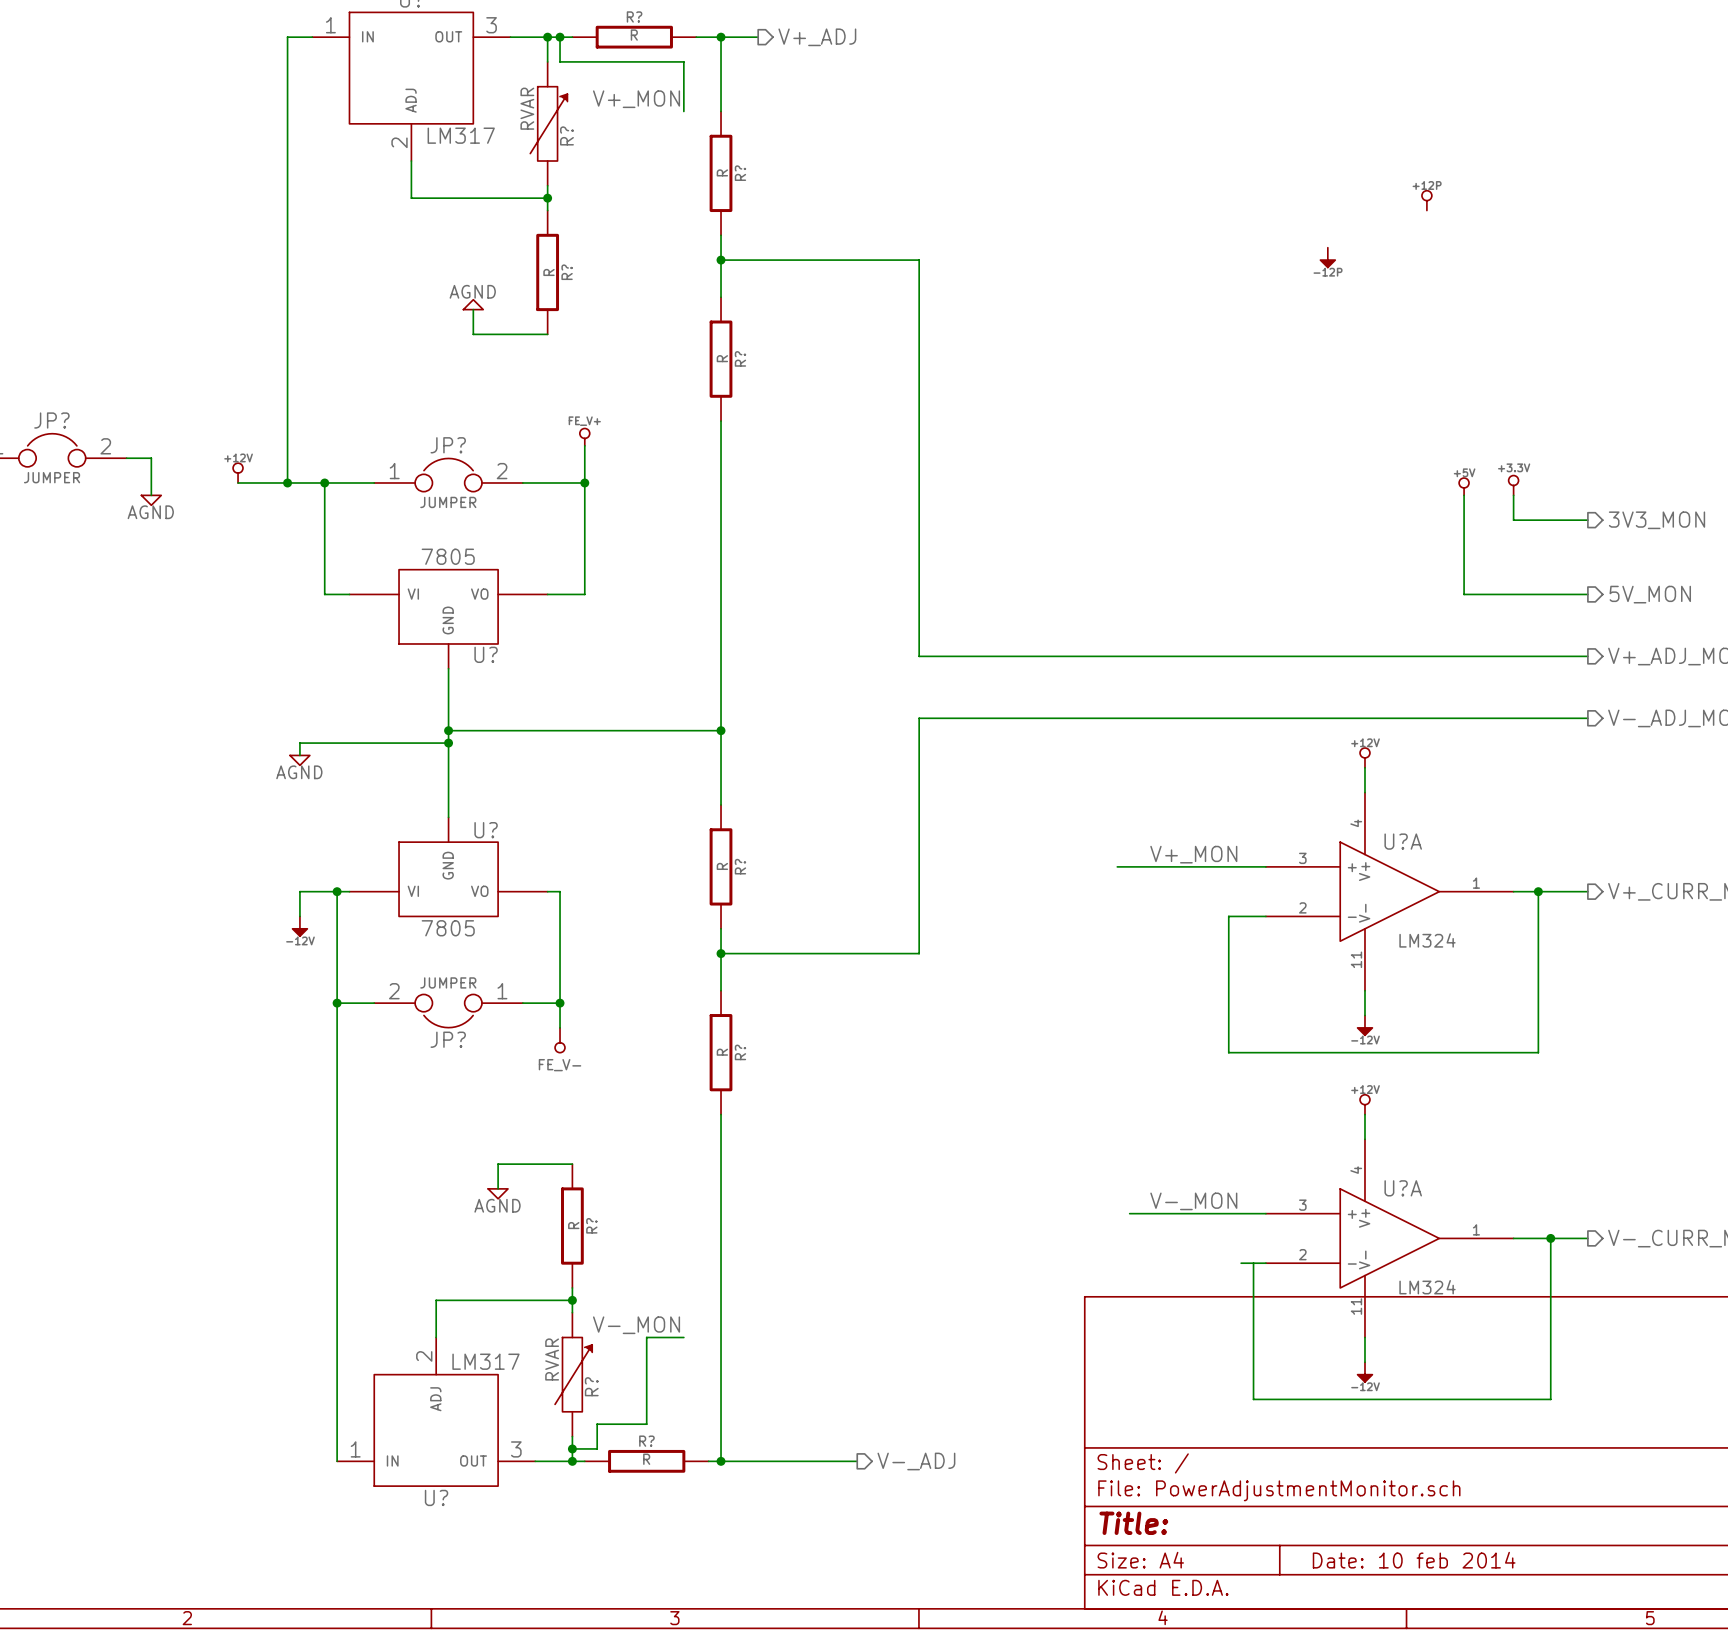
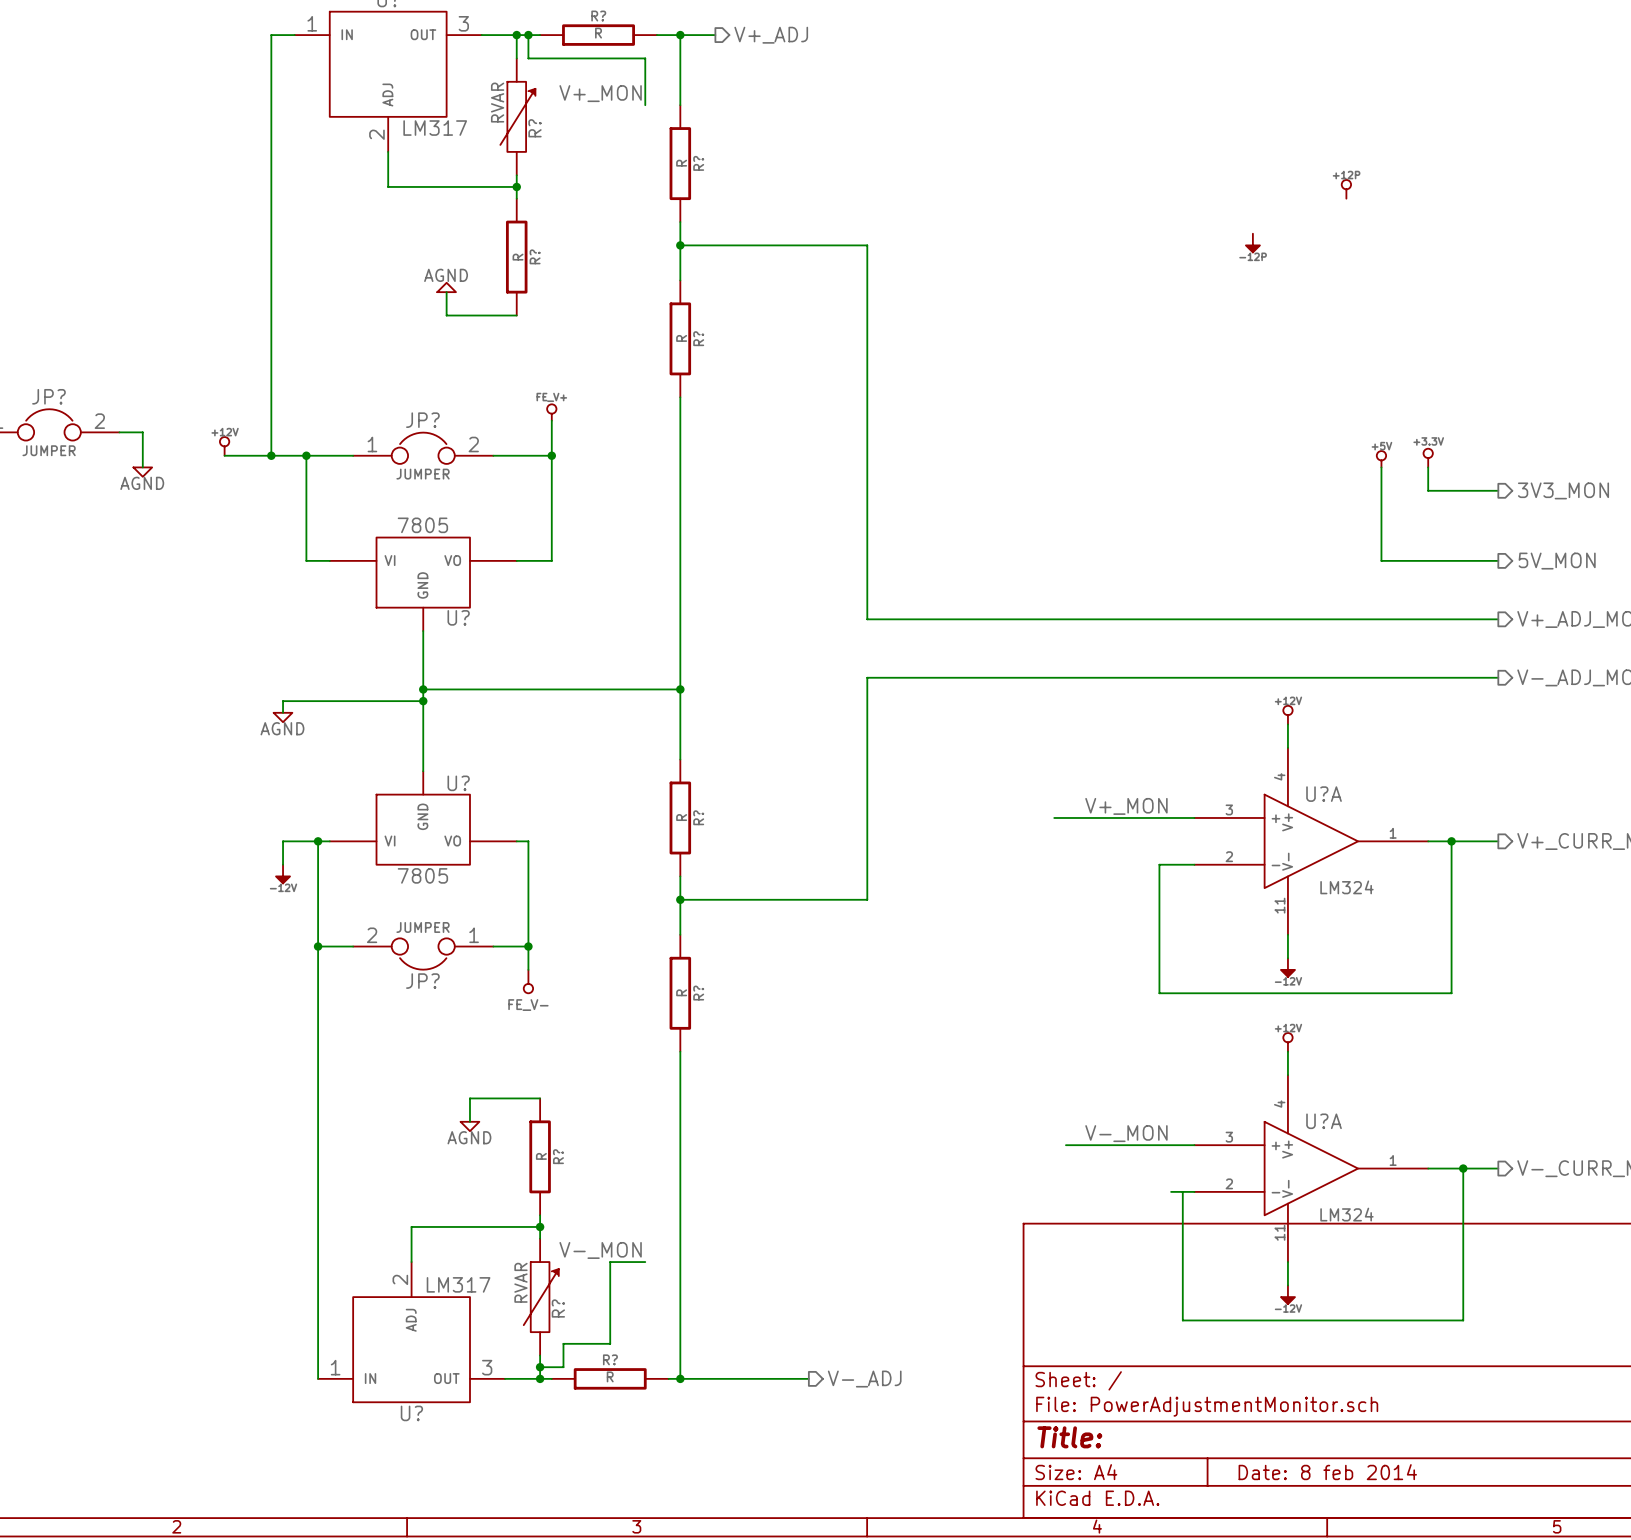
title block: Date: 10 feb 2014 (1414, 1560) -> Date: 8 feb 2014 (1327, 1472)

